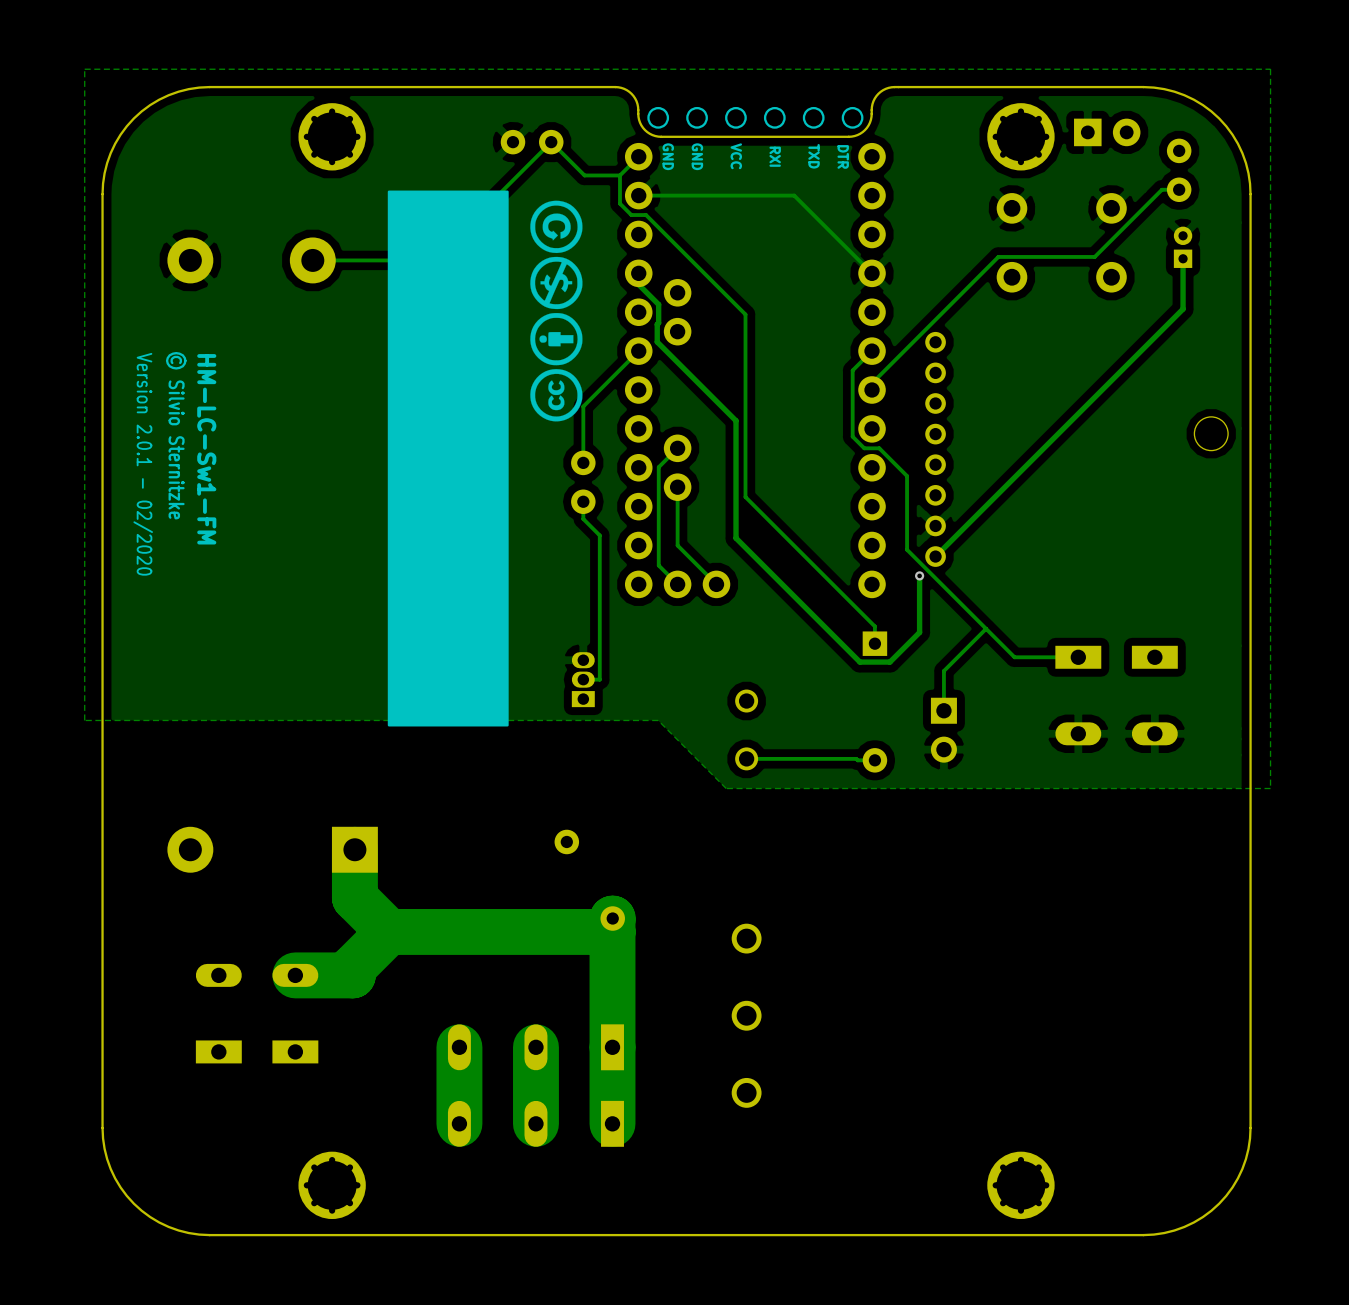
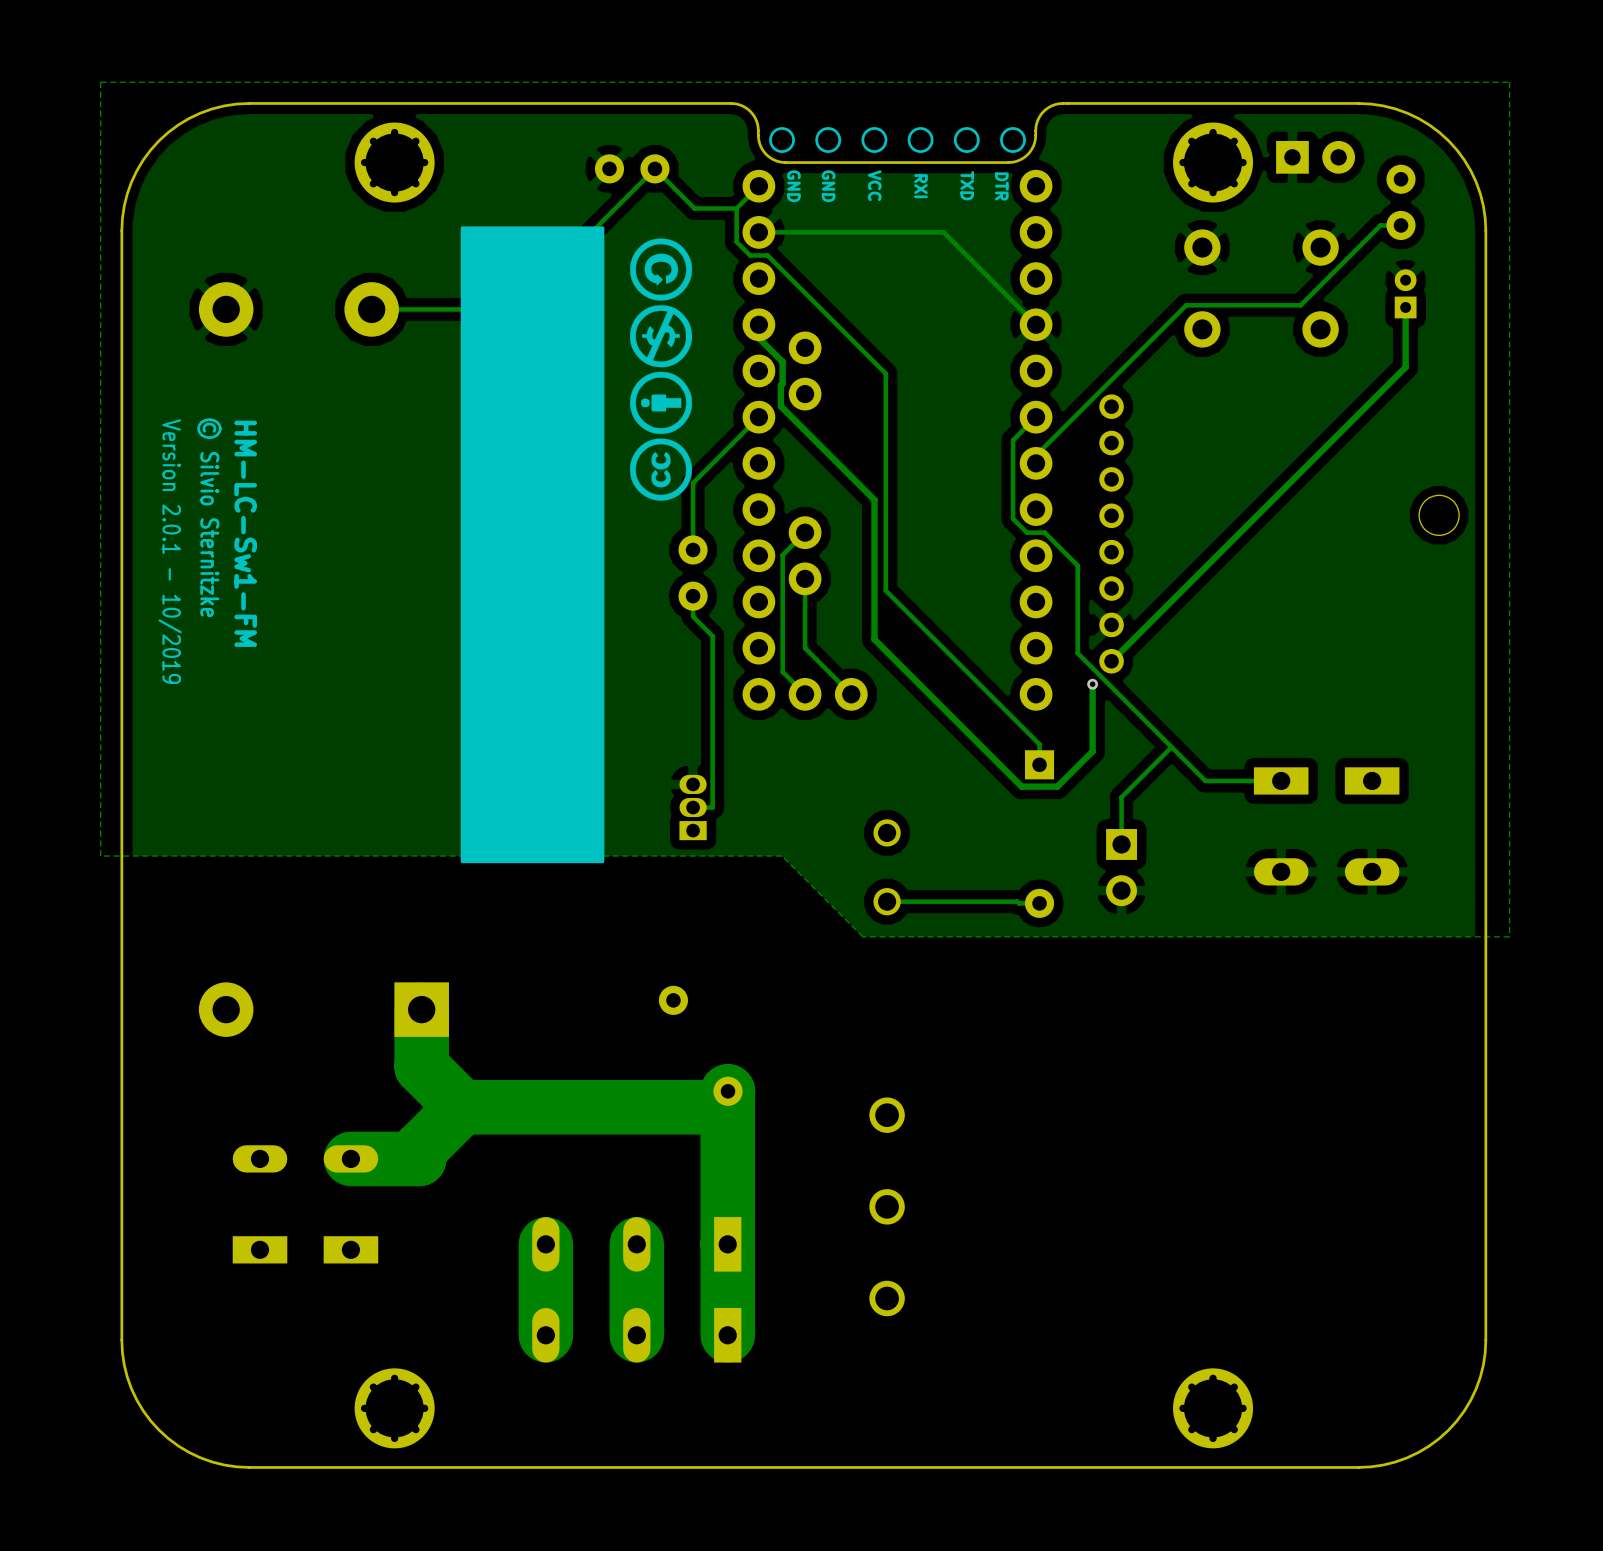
drawing shape: [133, 351, 187, 576] -> [158, 418, 222, 684]

